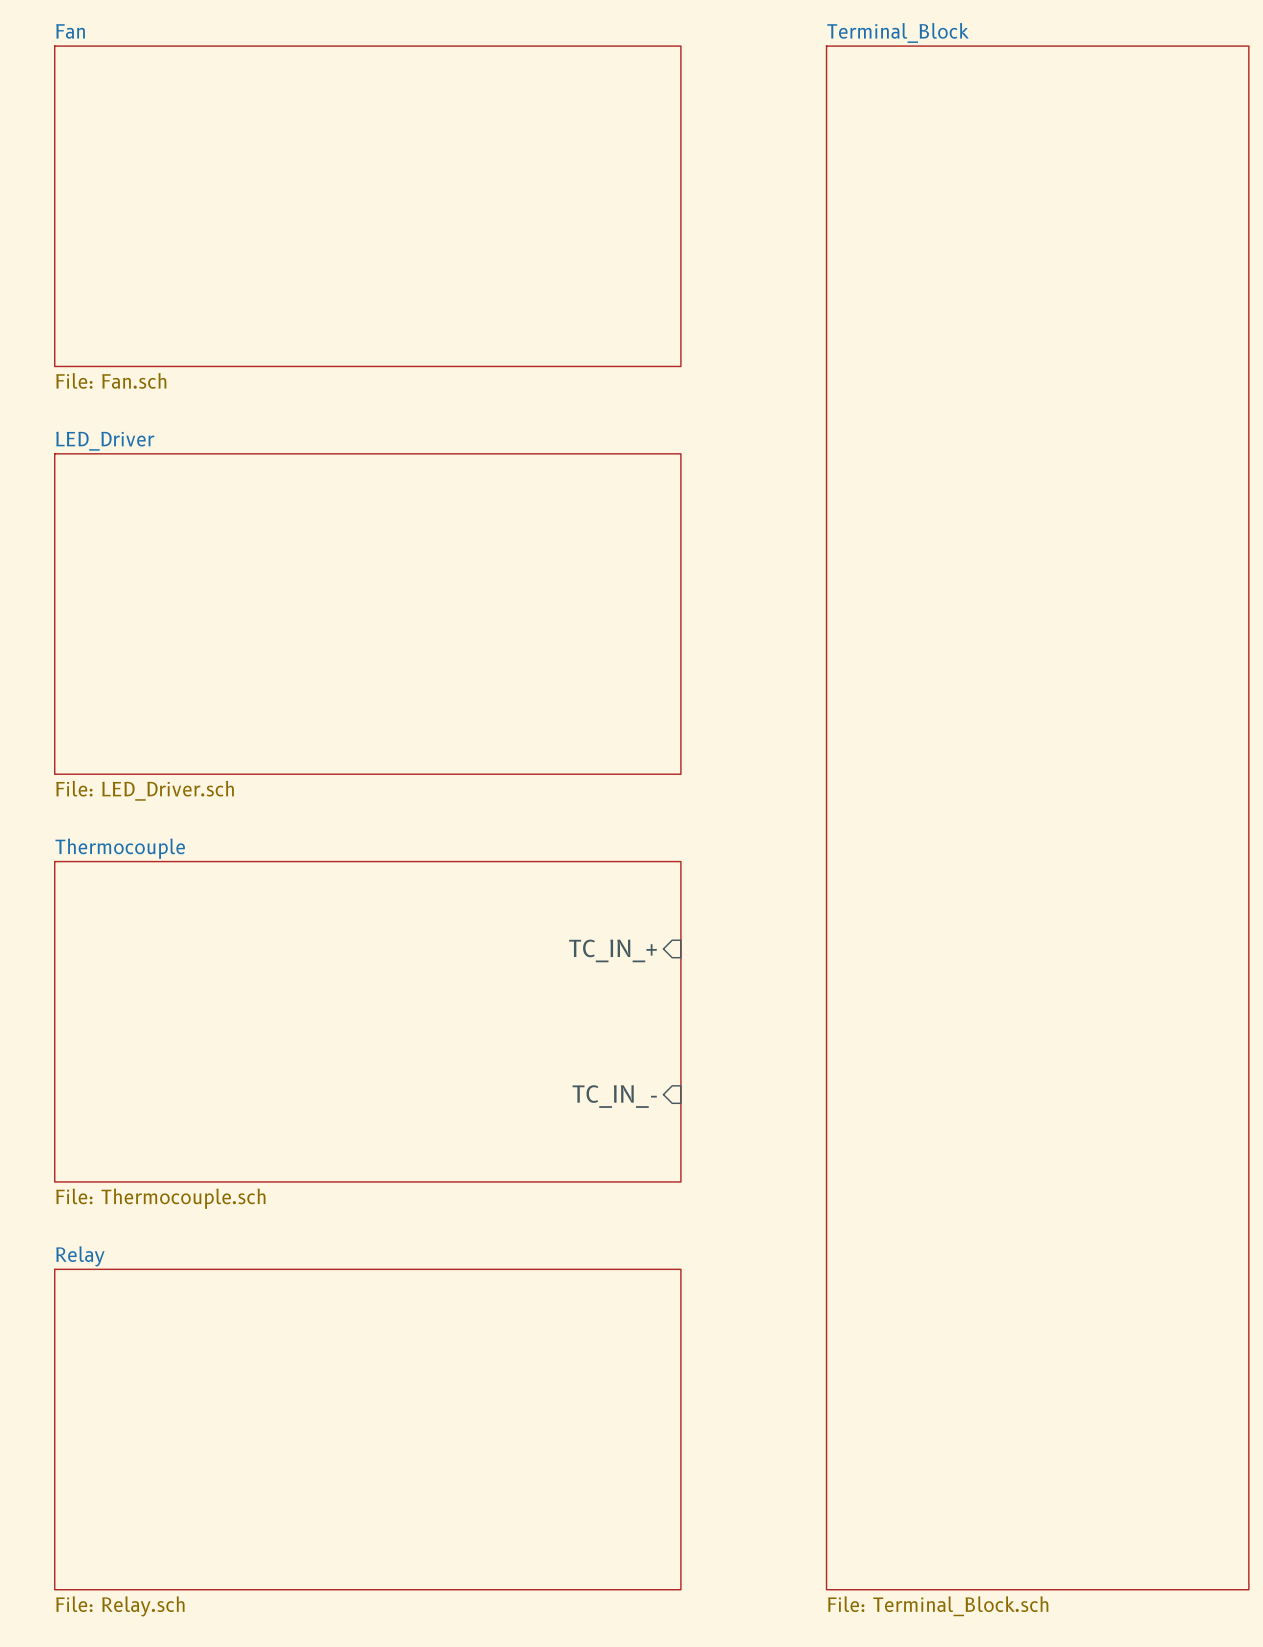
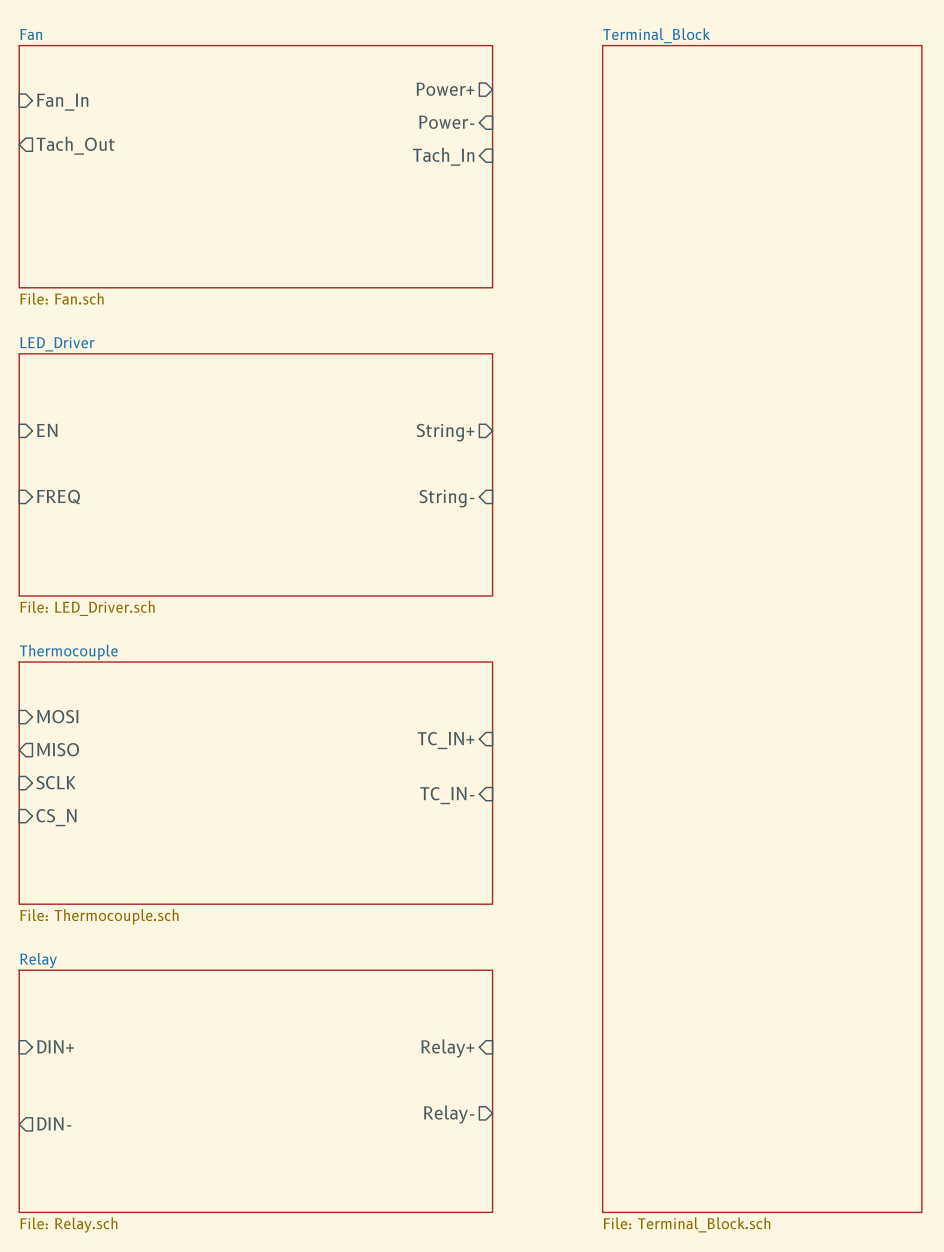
sheet pin: none -> Power+ (445, 89)
sheet pin: none -> Fan_In (62, 102)
sheet pin: none -> Power- (446, 122)
sheet pin: none -> Tach_Out (75, 145)
sheet pin: none -> Tach_In (443, 156)
sheet pin: none -> EN (47, 430)
sheet pin: none -> String+ (445, 432)
sheet pin: none -> FREQ (58, 497)
sheet pin: none -> String- (446, 498)
sheet pin: none -> MOSI (57, 716)
sheet pin: TC_IN_+ (612, 950) -> TC_IN+ (445, 740)
sheet pin: none -> MISO (58, 749)
sheet pin: none -> SCLK (56, 782)
sheet pin: none -> TC_IN- (447, 795)
sheet pin: none -> CS_N (56, 817)
sheet pin: TC_IN_- (614, 1096) -> none
sheet pin: none -> DIN+ (55, 1046)
sheet pin: none -> Relay+ (447, 1048)
sheet pin: none -> Relay- (449, 1114)
sheet pin: none -> DIN- (54, 1123)

